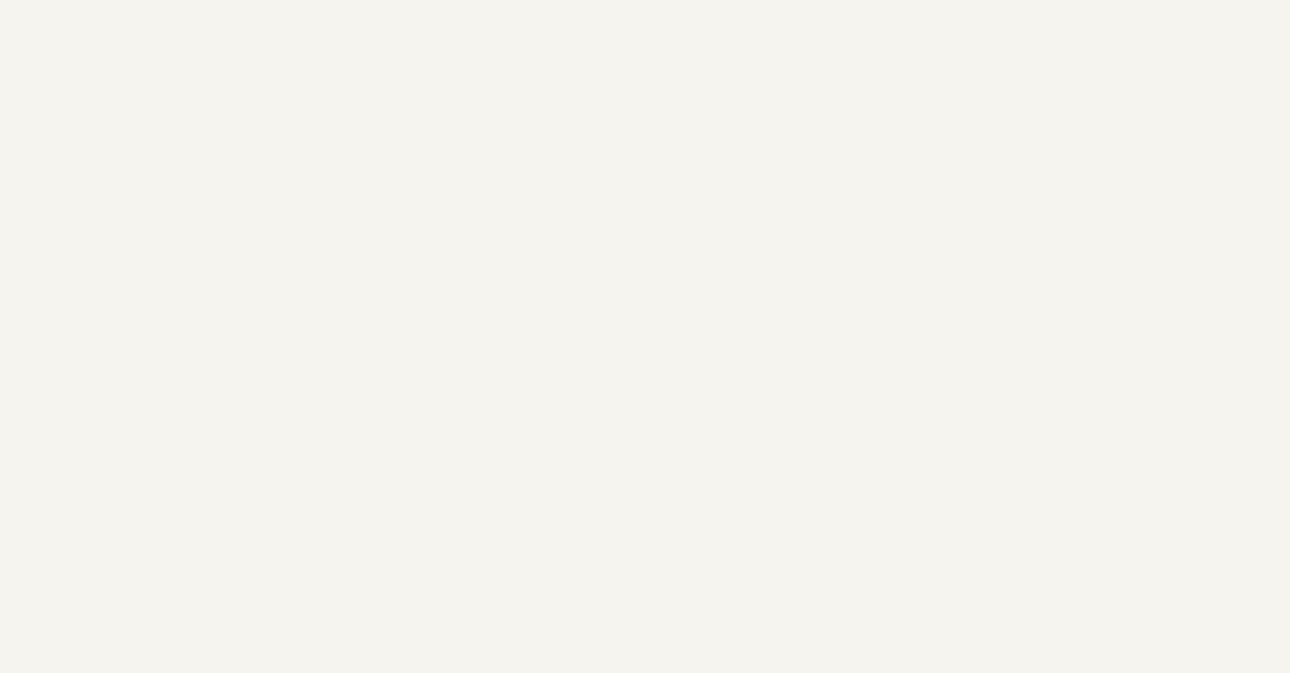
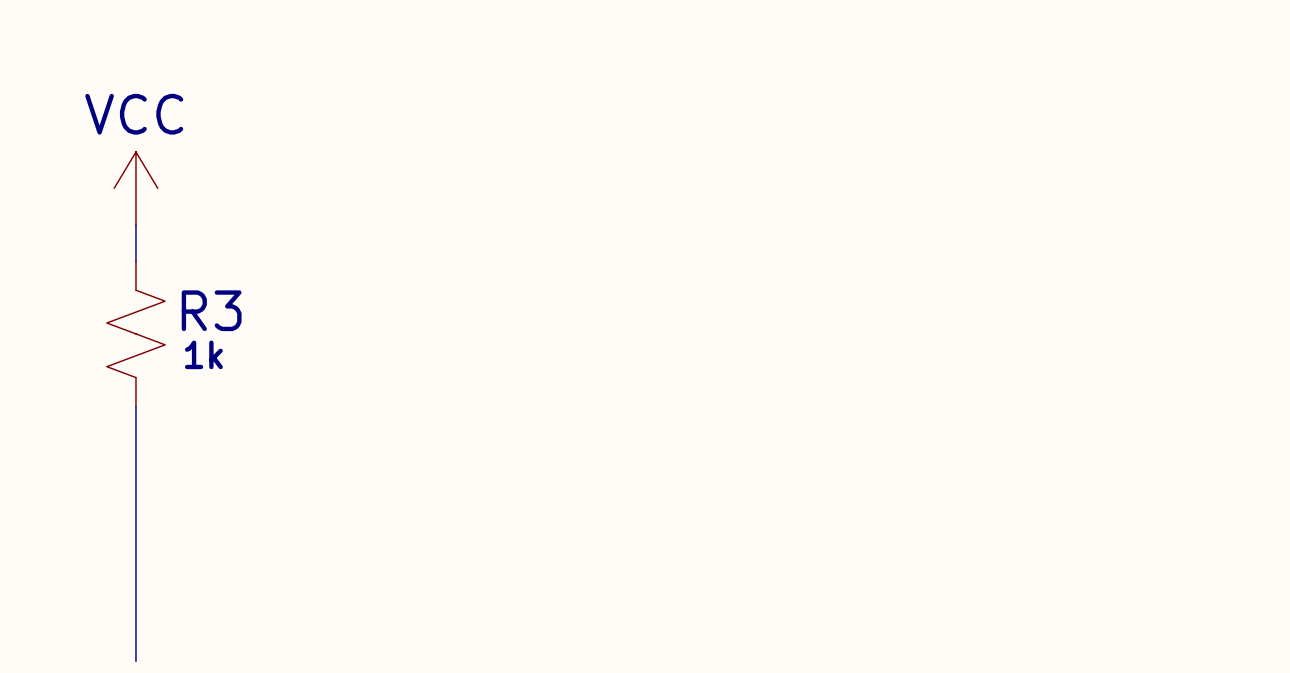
power symbol: none -> VCC (135, 188)
wire: none -> (135, 224) (135, 261)
R3: none -> 1k (135, 333)
wire: none -> (135, 406) (135, 661)

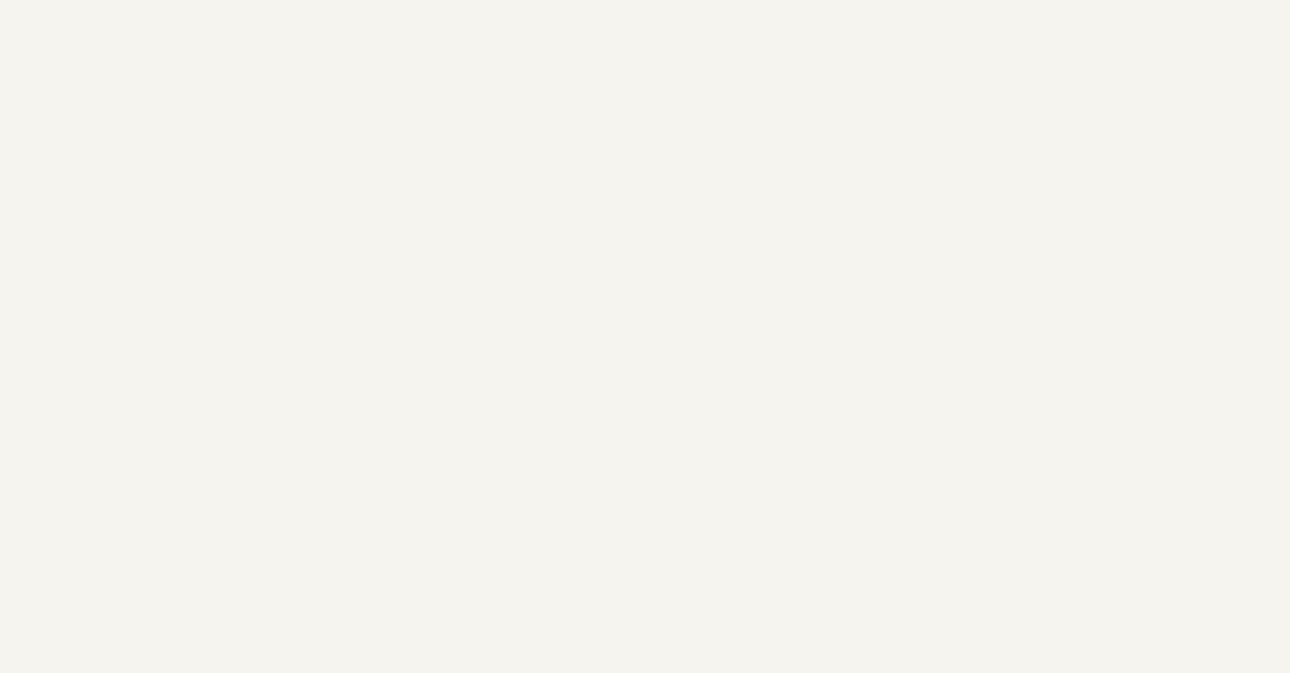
power symbol: VCC (135, 188) -> none
wire: (135, 224) (135, 261) -> none
R3: 1k (135, 333) -> none
wire: (135, 406) (135, 661) -> none

